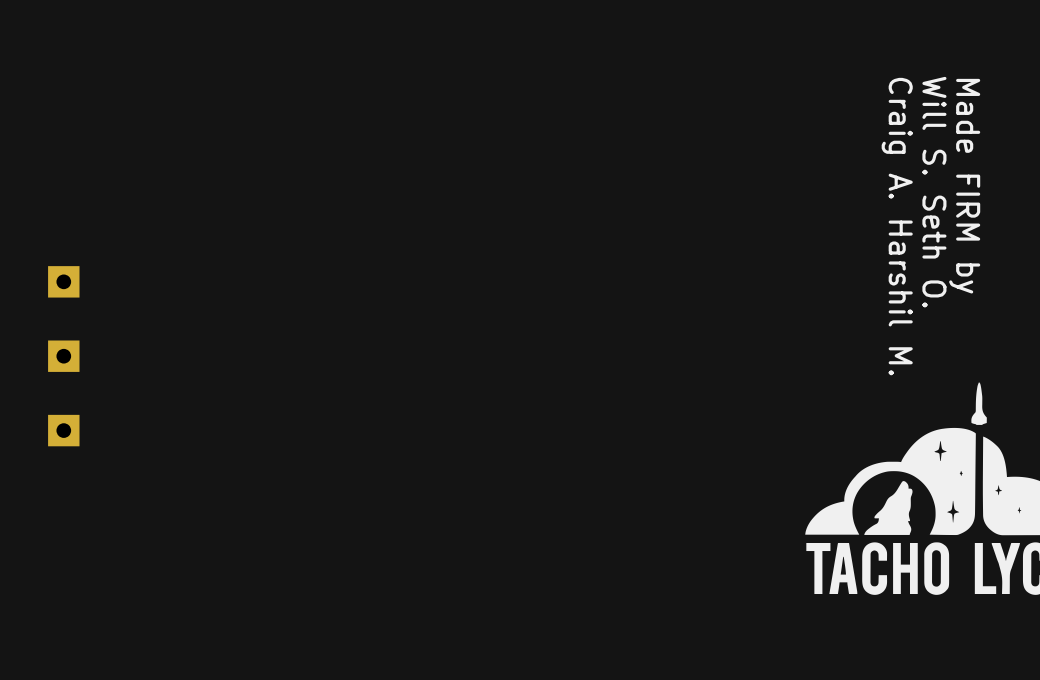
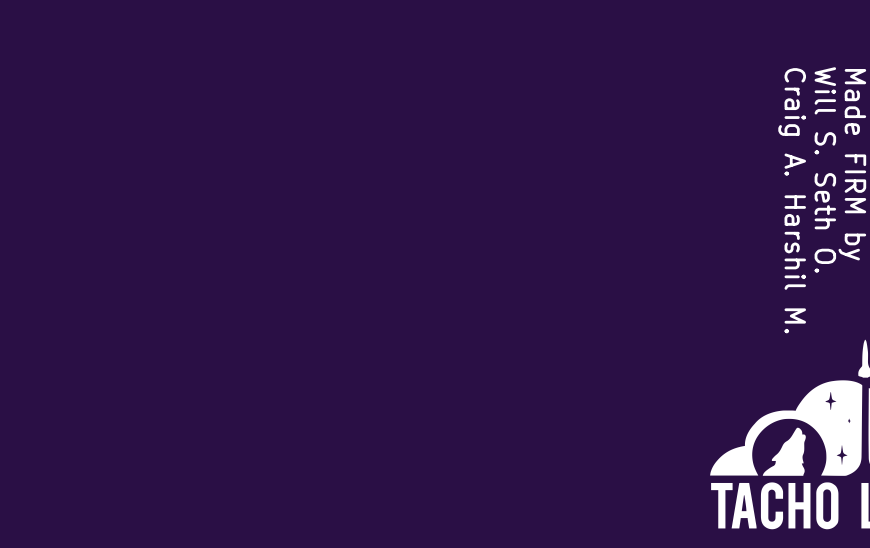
part: (63, 281) -> none
part: (63, 356) -> none
part: (63, 430) -> none

